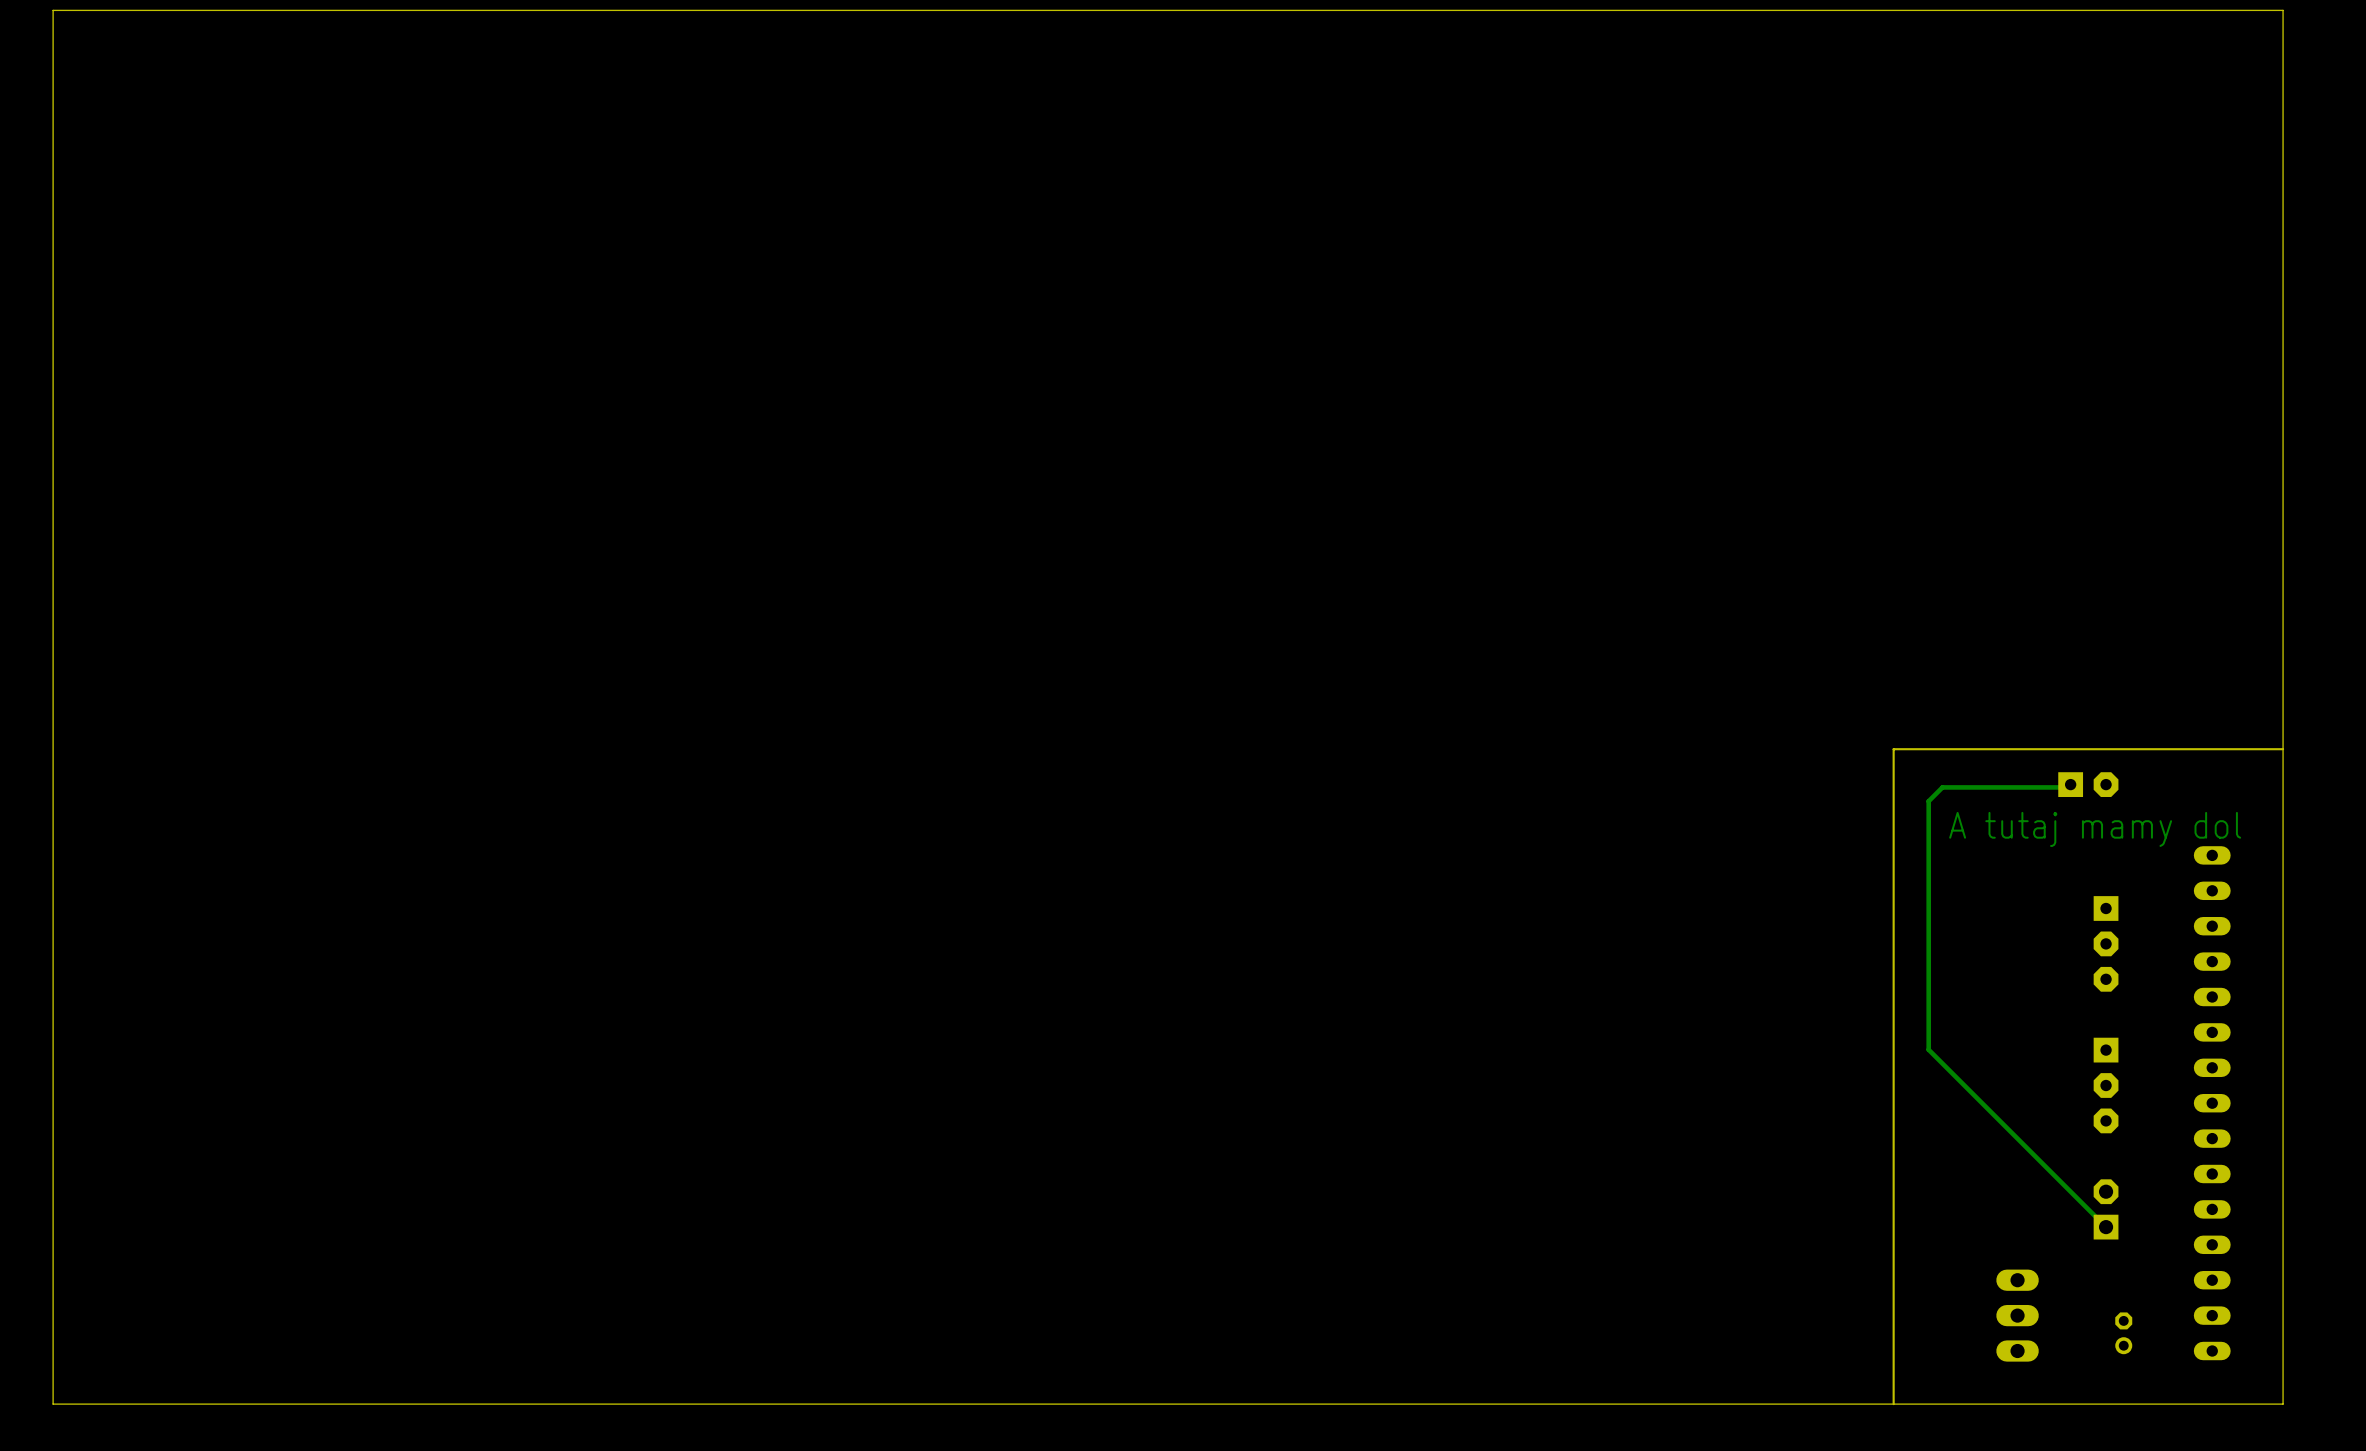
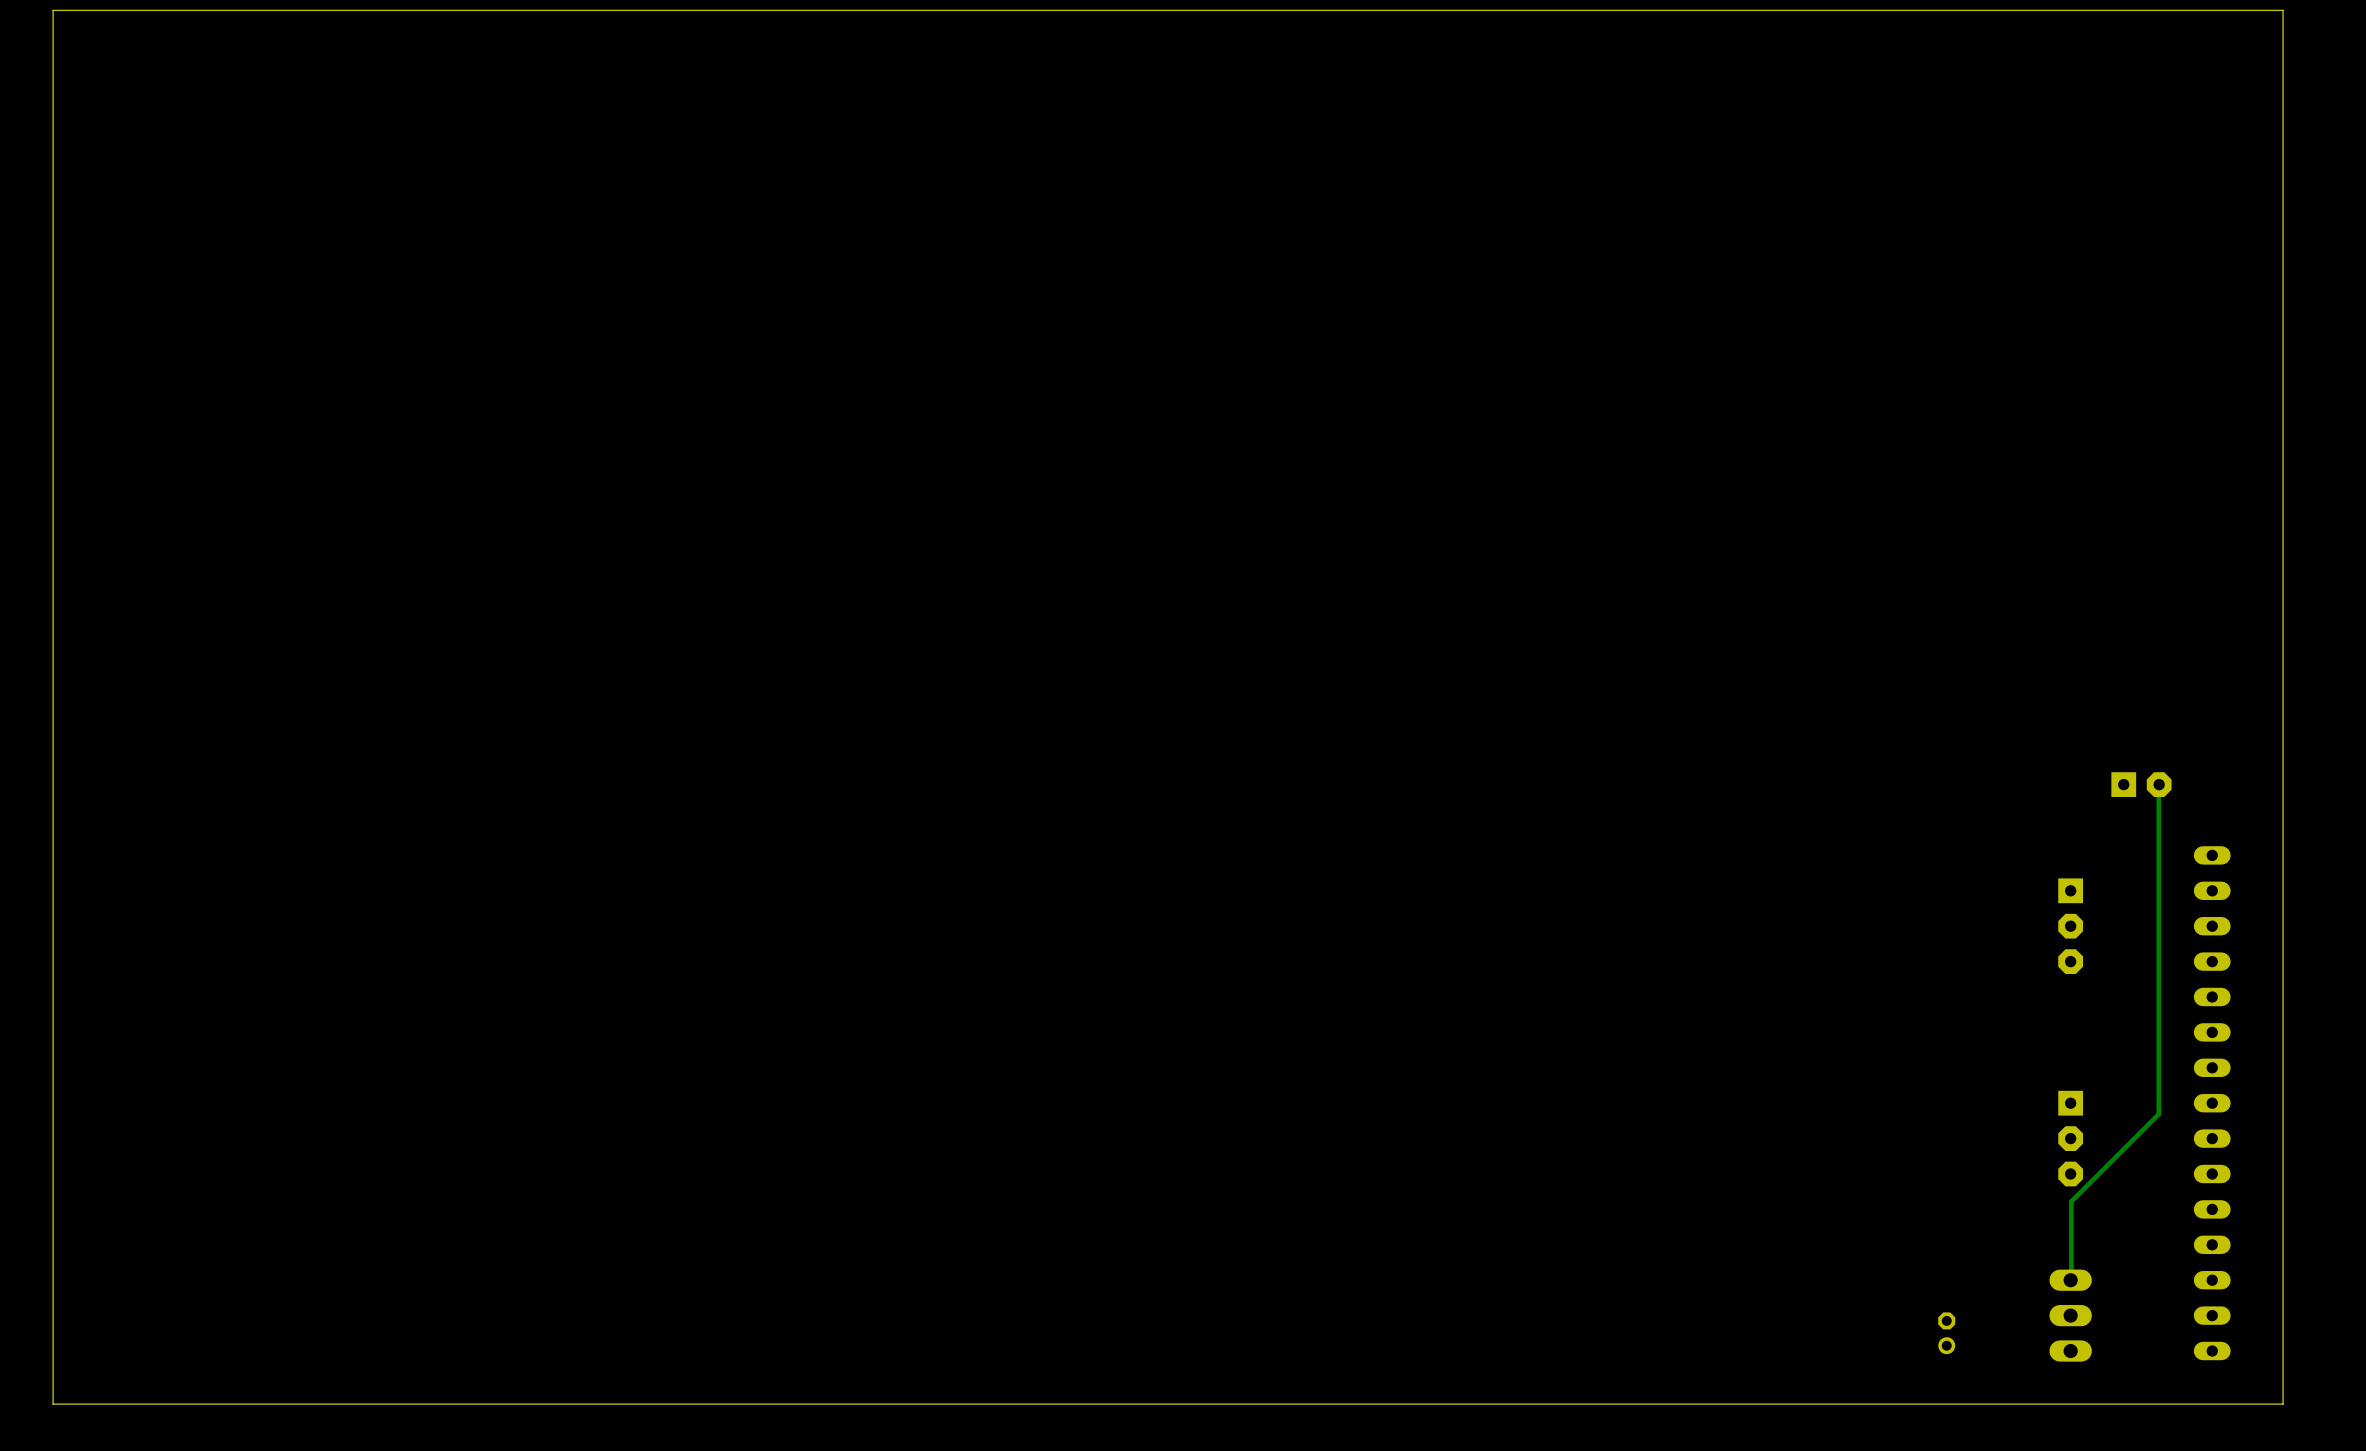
board edge: (2283, 749) (1893, 749) (1893, 1404) -> none
track: (2070, 784) (2066, 787) (1942, 787) (1928, 801) (1928, 1049) (2106, 1227) -> none
part position: (2088, 784) -> (2141, 784)
track: none -> (2159, 784) (2158, 1114) (2071, 1201) (2070, 1280)
text: A tutaj mamy dol (2095, 829) -> none
part position: (2106, 943) -> (2070, 926)
part position: (2106, 1085) -> (2070, 1138)
part: (2106, 1209) -> none
part position: (2017, 1315) -> (2070, 1315)
part position: (2123, 1333) -> (1946, 1333)

